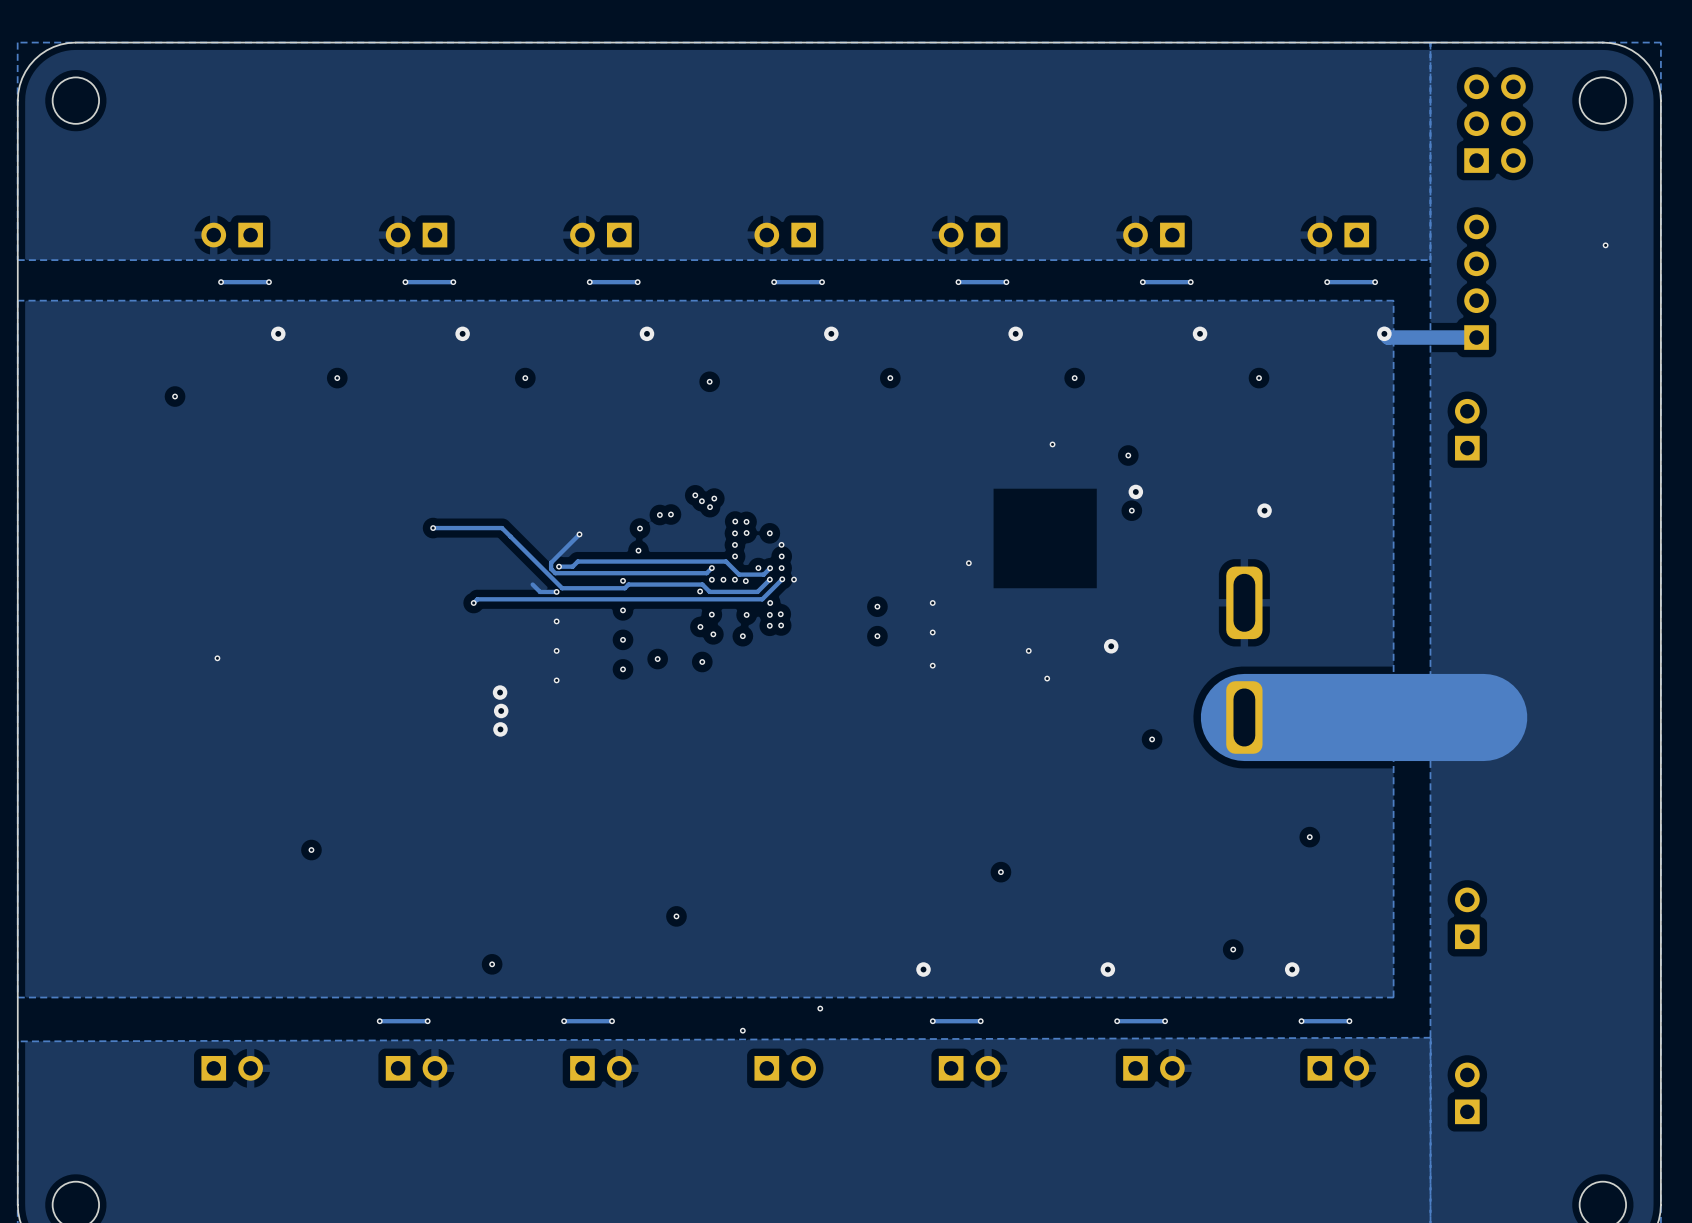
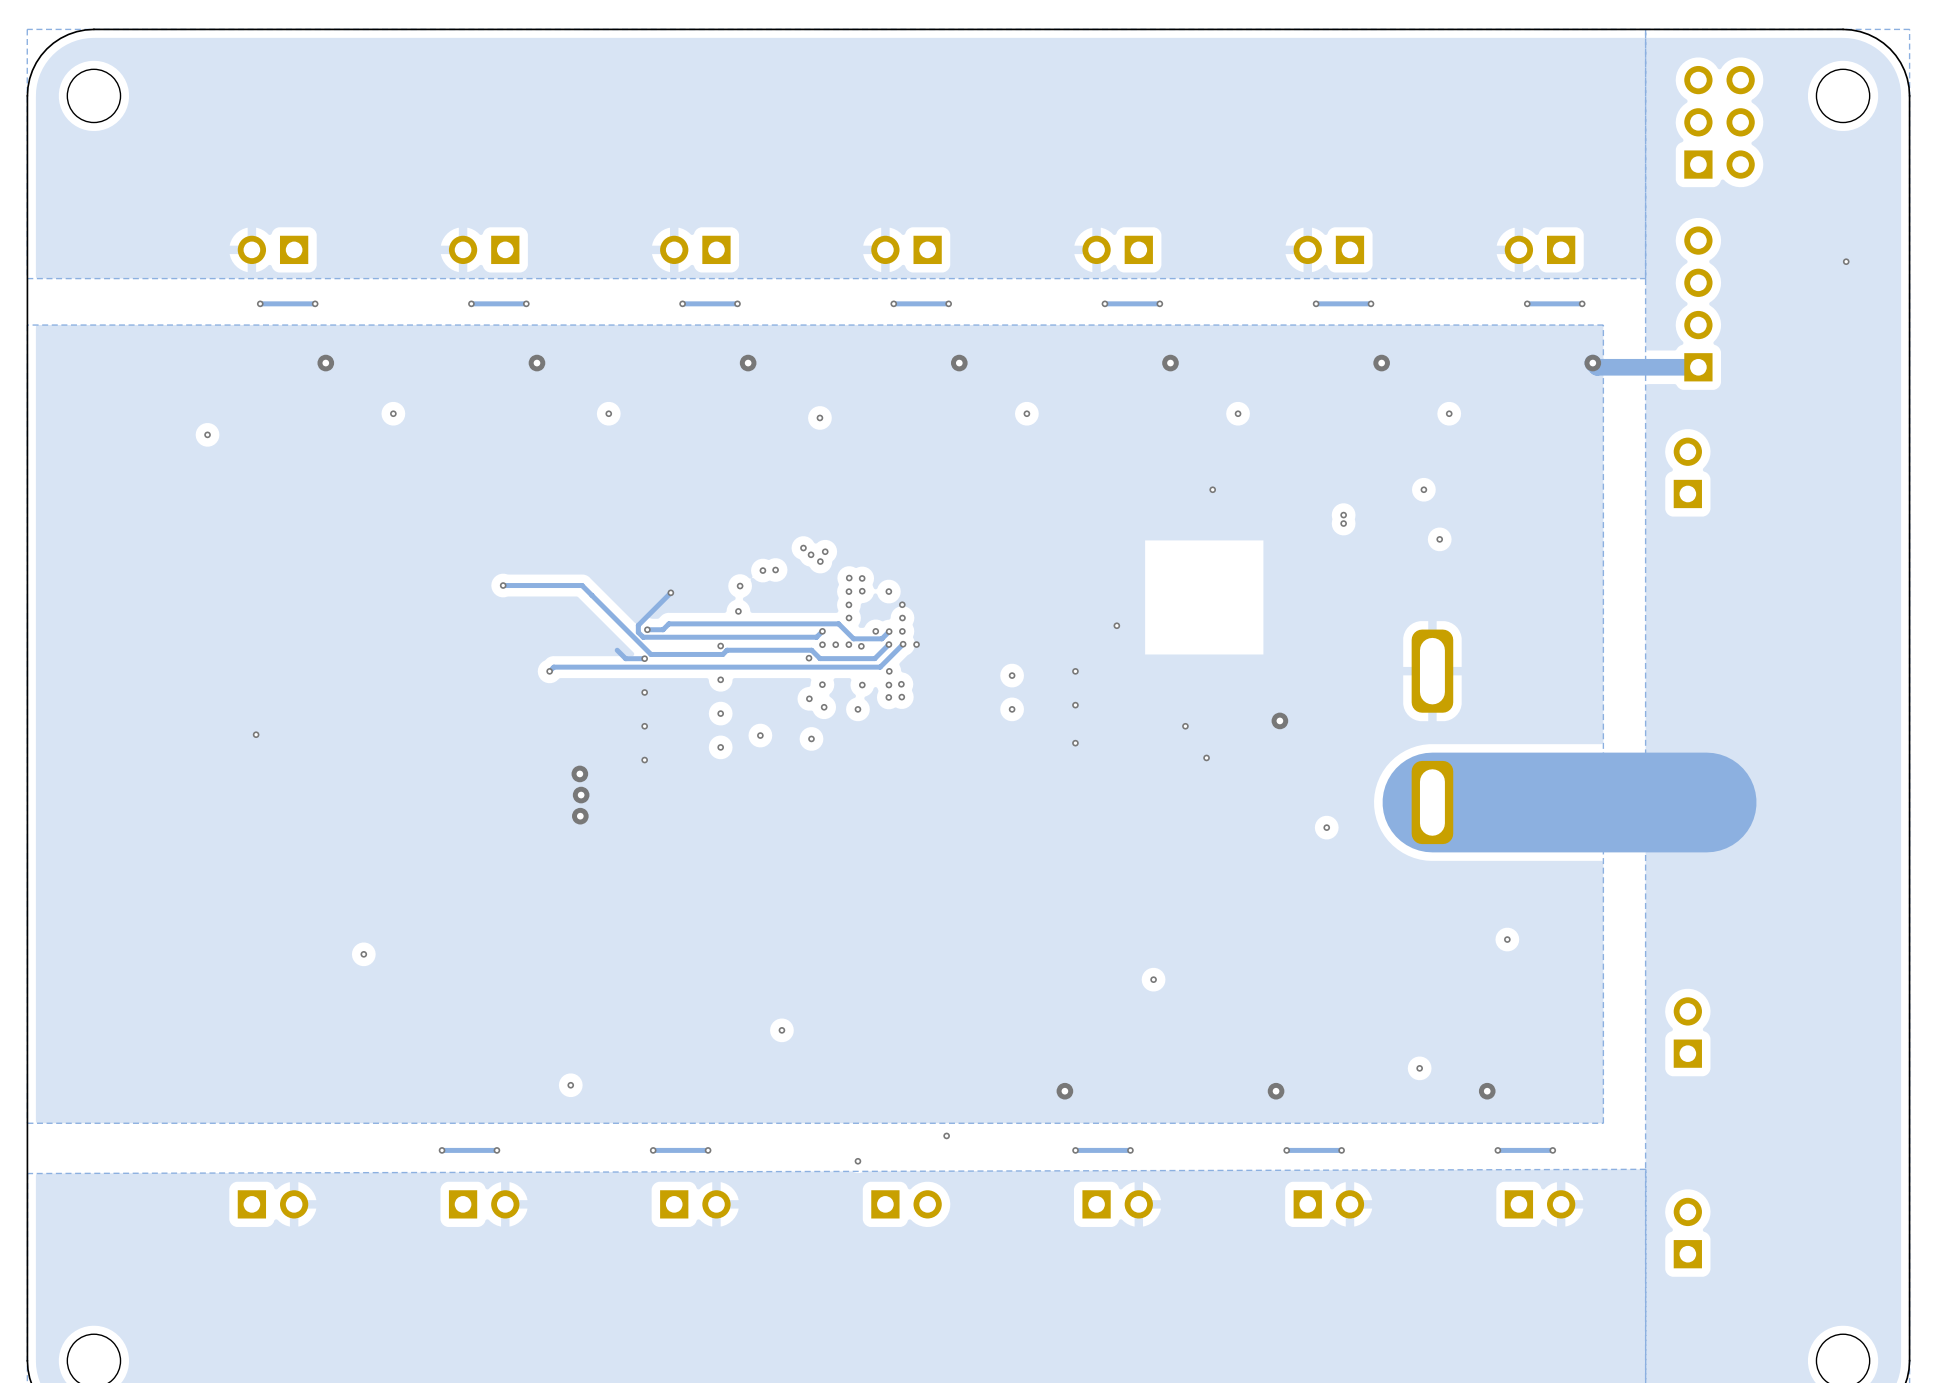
via: none -> (1423, 489)
via: (1128, 455) -> none
via: none -> (1343, 515)
via: none -> (1343, 523)
via: none -> (1439, 539)
via: (1135, 491) -> none
via: (1131, 510) -> none
via: (1264, 510) -> none

